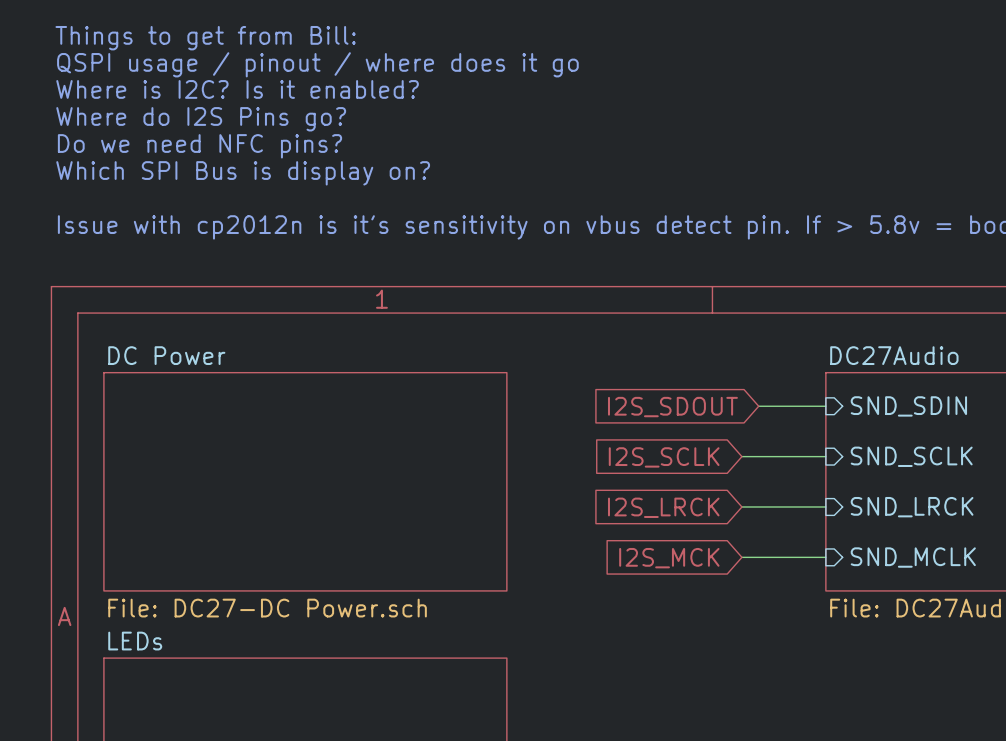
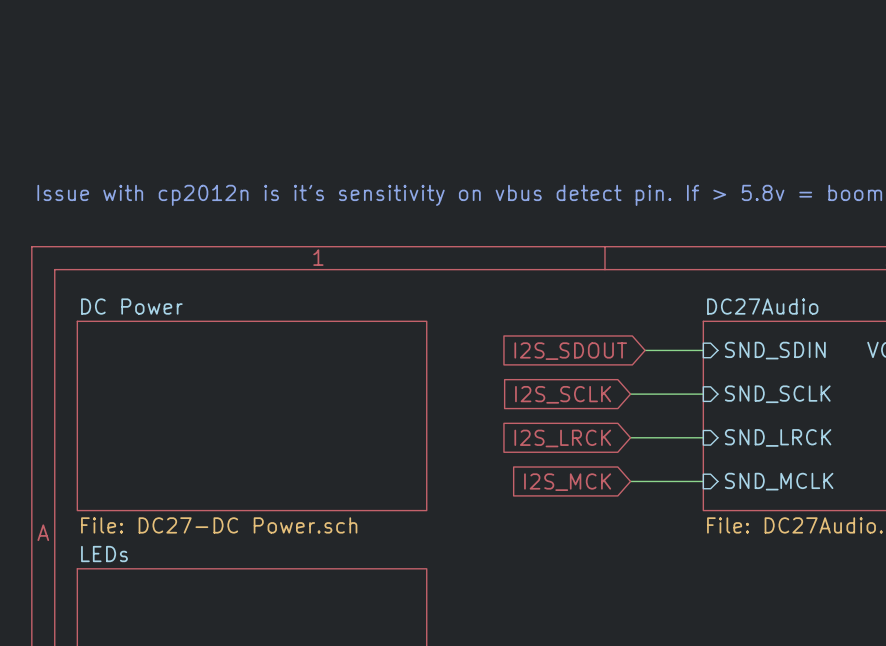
text: Things to get from Bill: (205, 38) -> none
text: QSPI usage / pinout / where does it go (317, 64) -> none
text: Where is I2C? Is it enabled? (237, 89) -> none
text: Where do I2S Pins go? (201, 119) -> none
text: Do we need NFC pins? (199, 146) -> none
text: Which SPI Bus is display on? (243, 173) -> none

